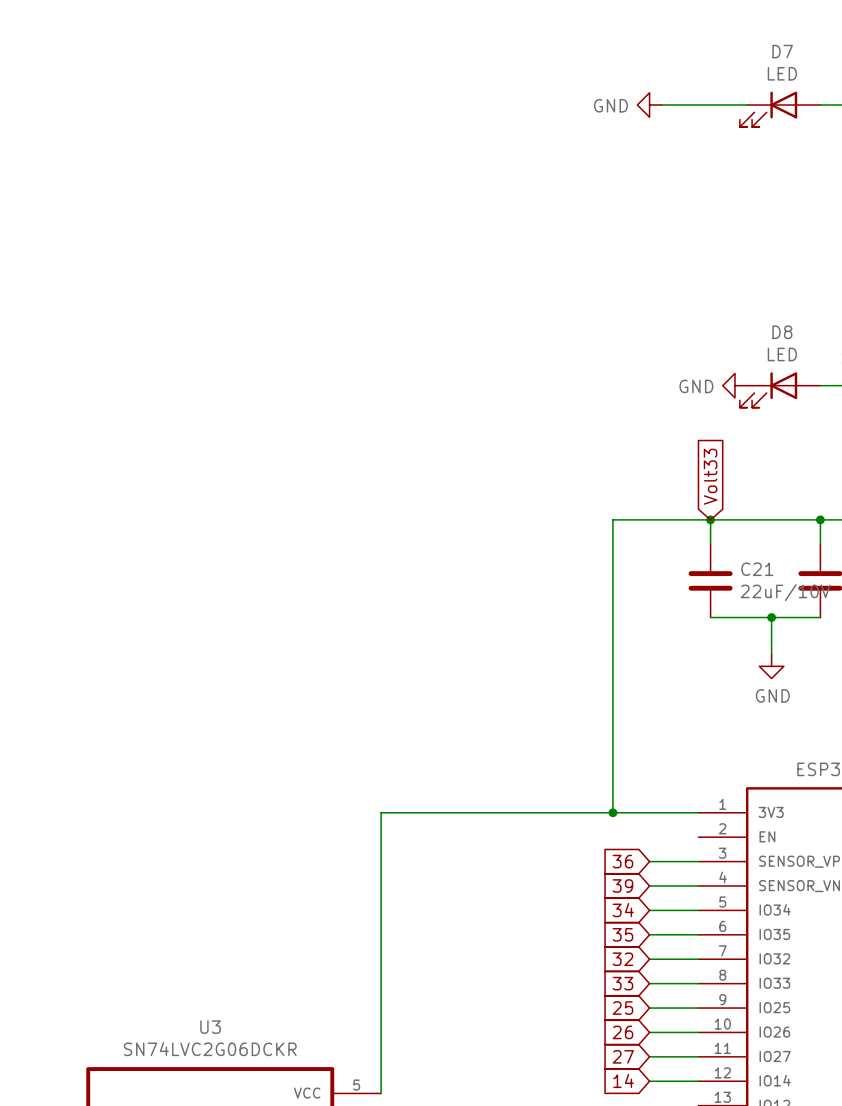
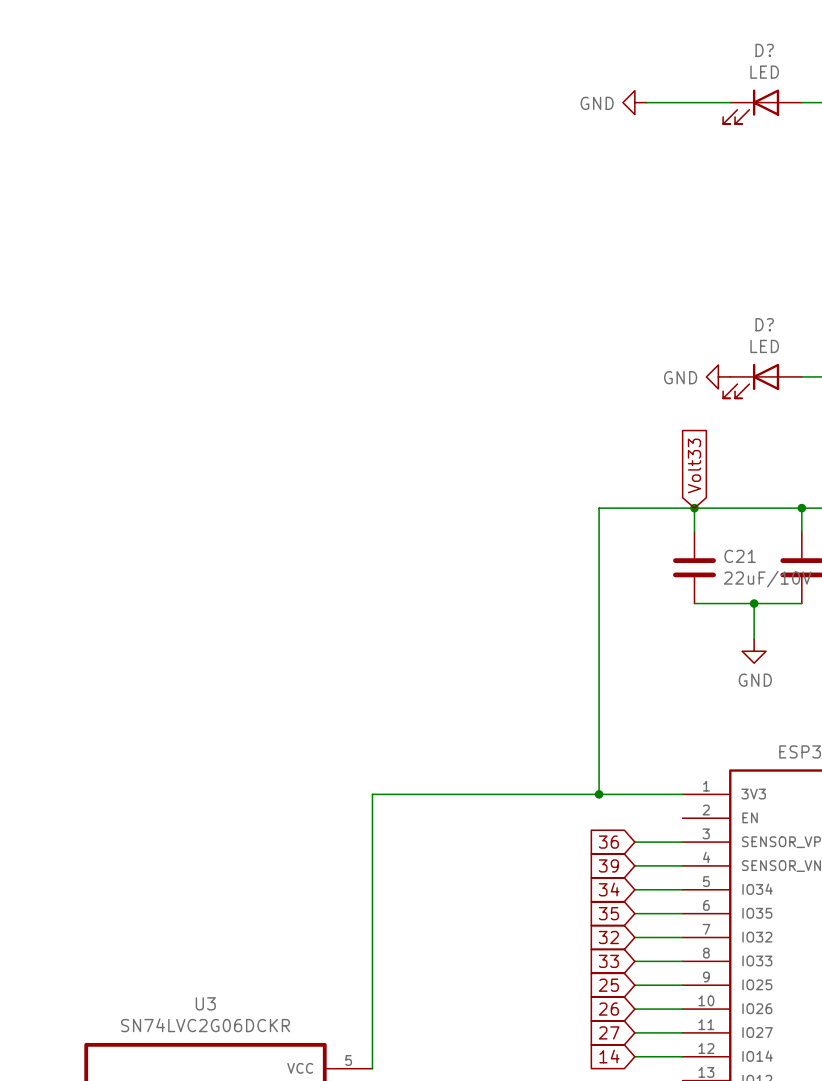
D7 name: D7 (782, 51) -> D? (764, 50)
D8 name: D8 (782, 332) -> D? (764, 324)

